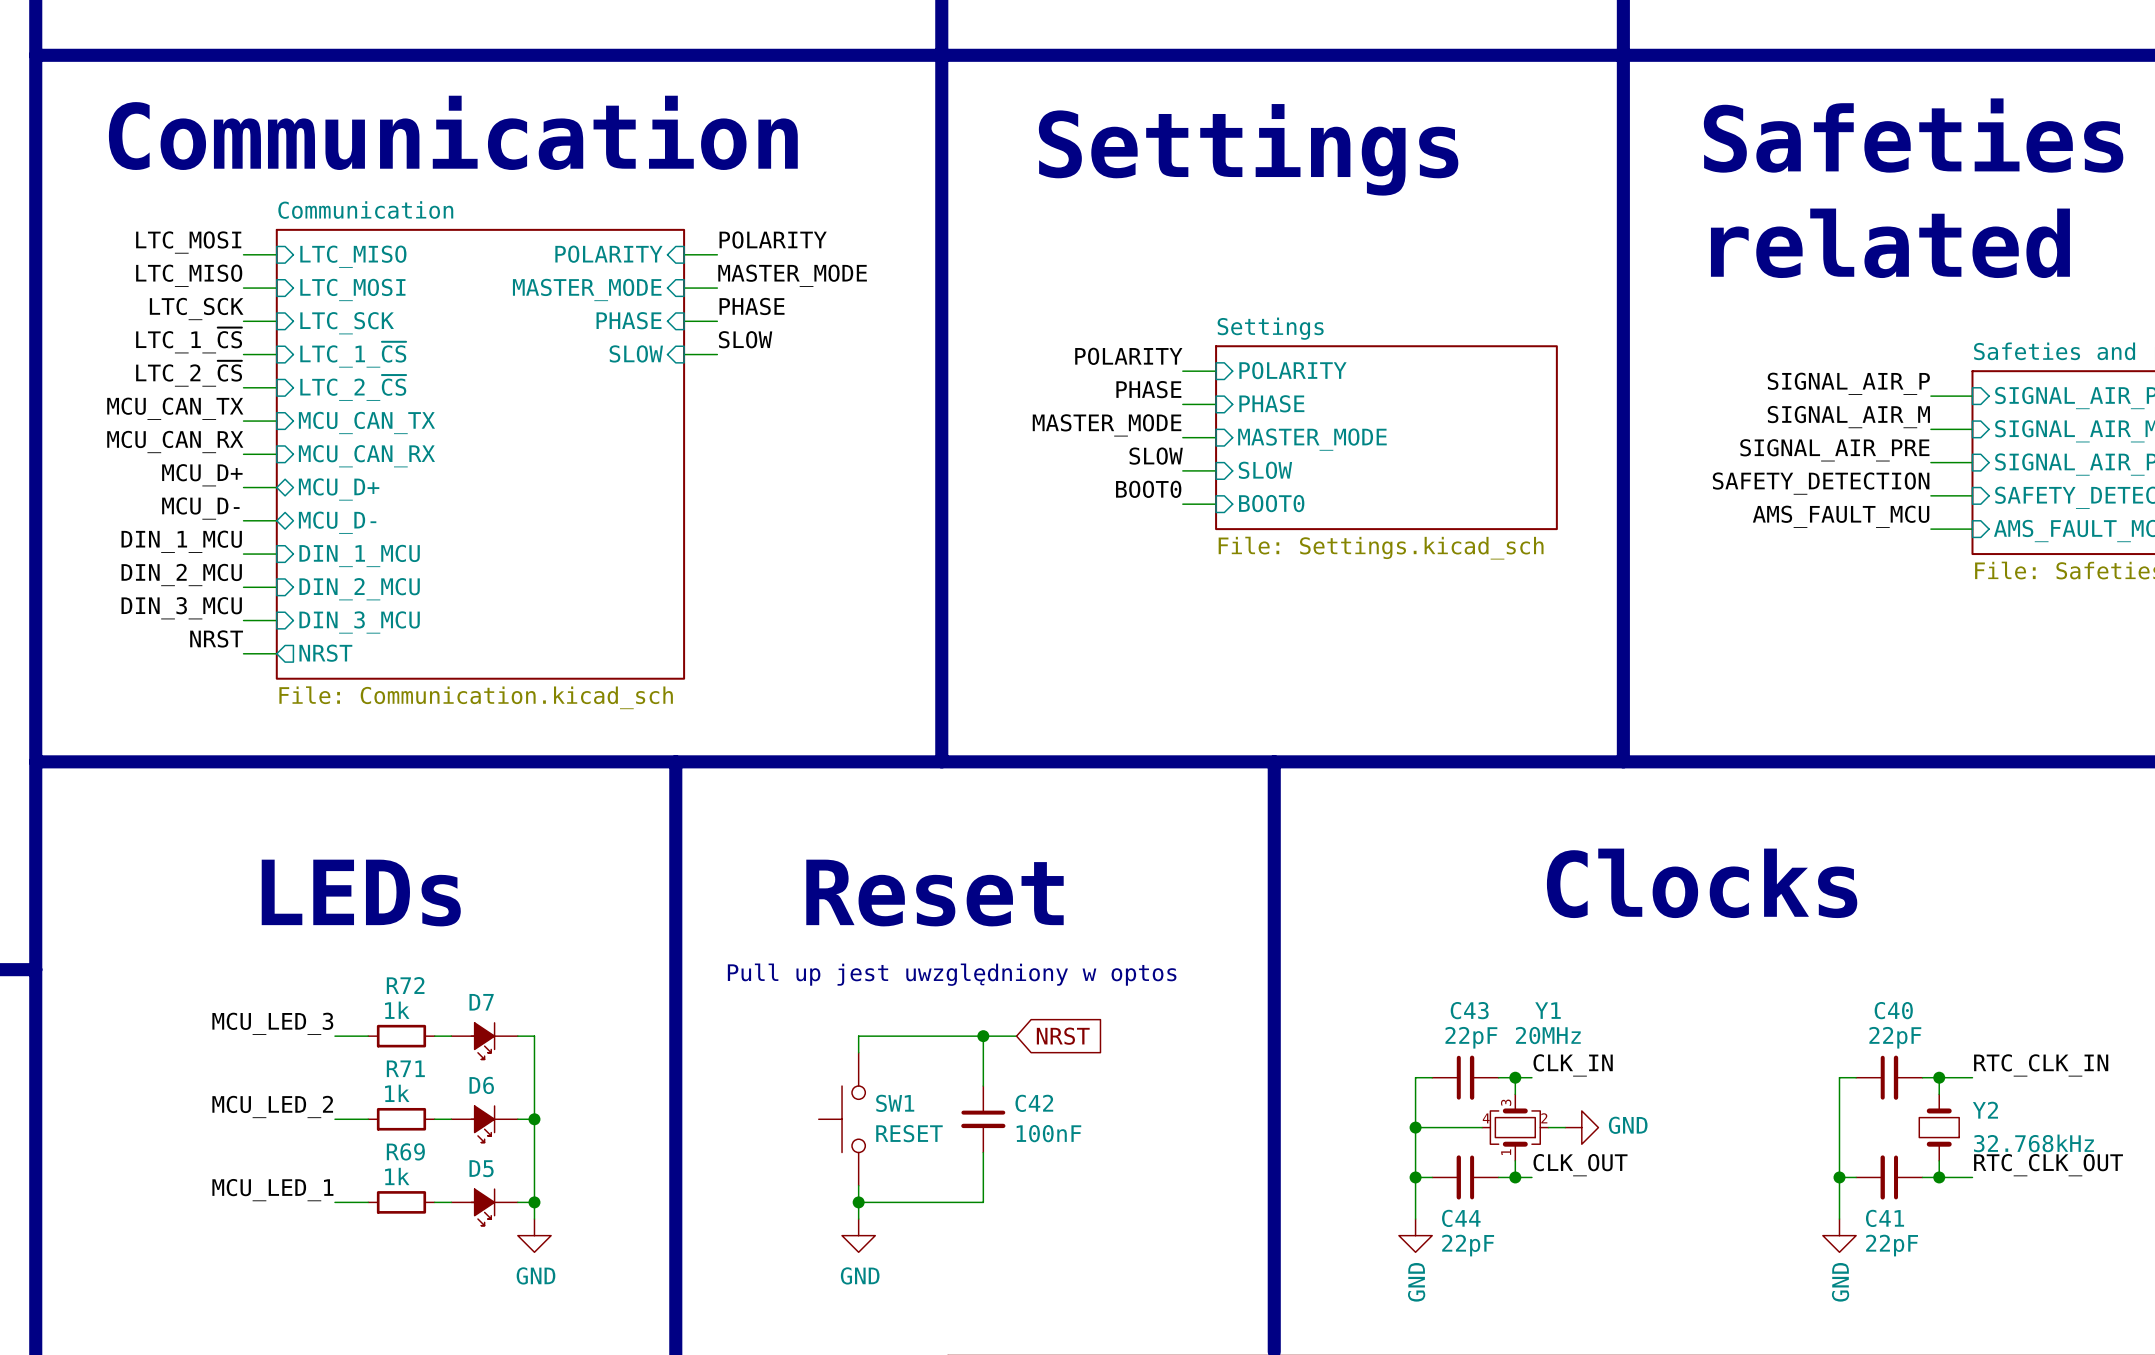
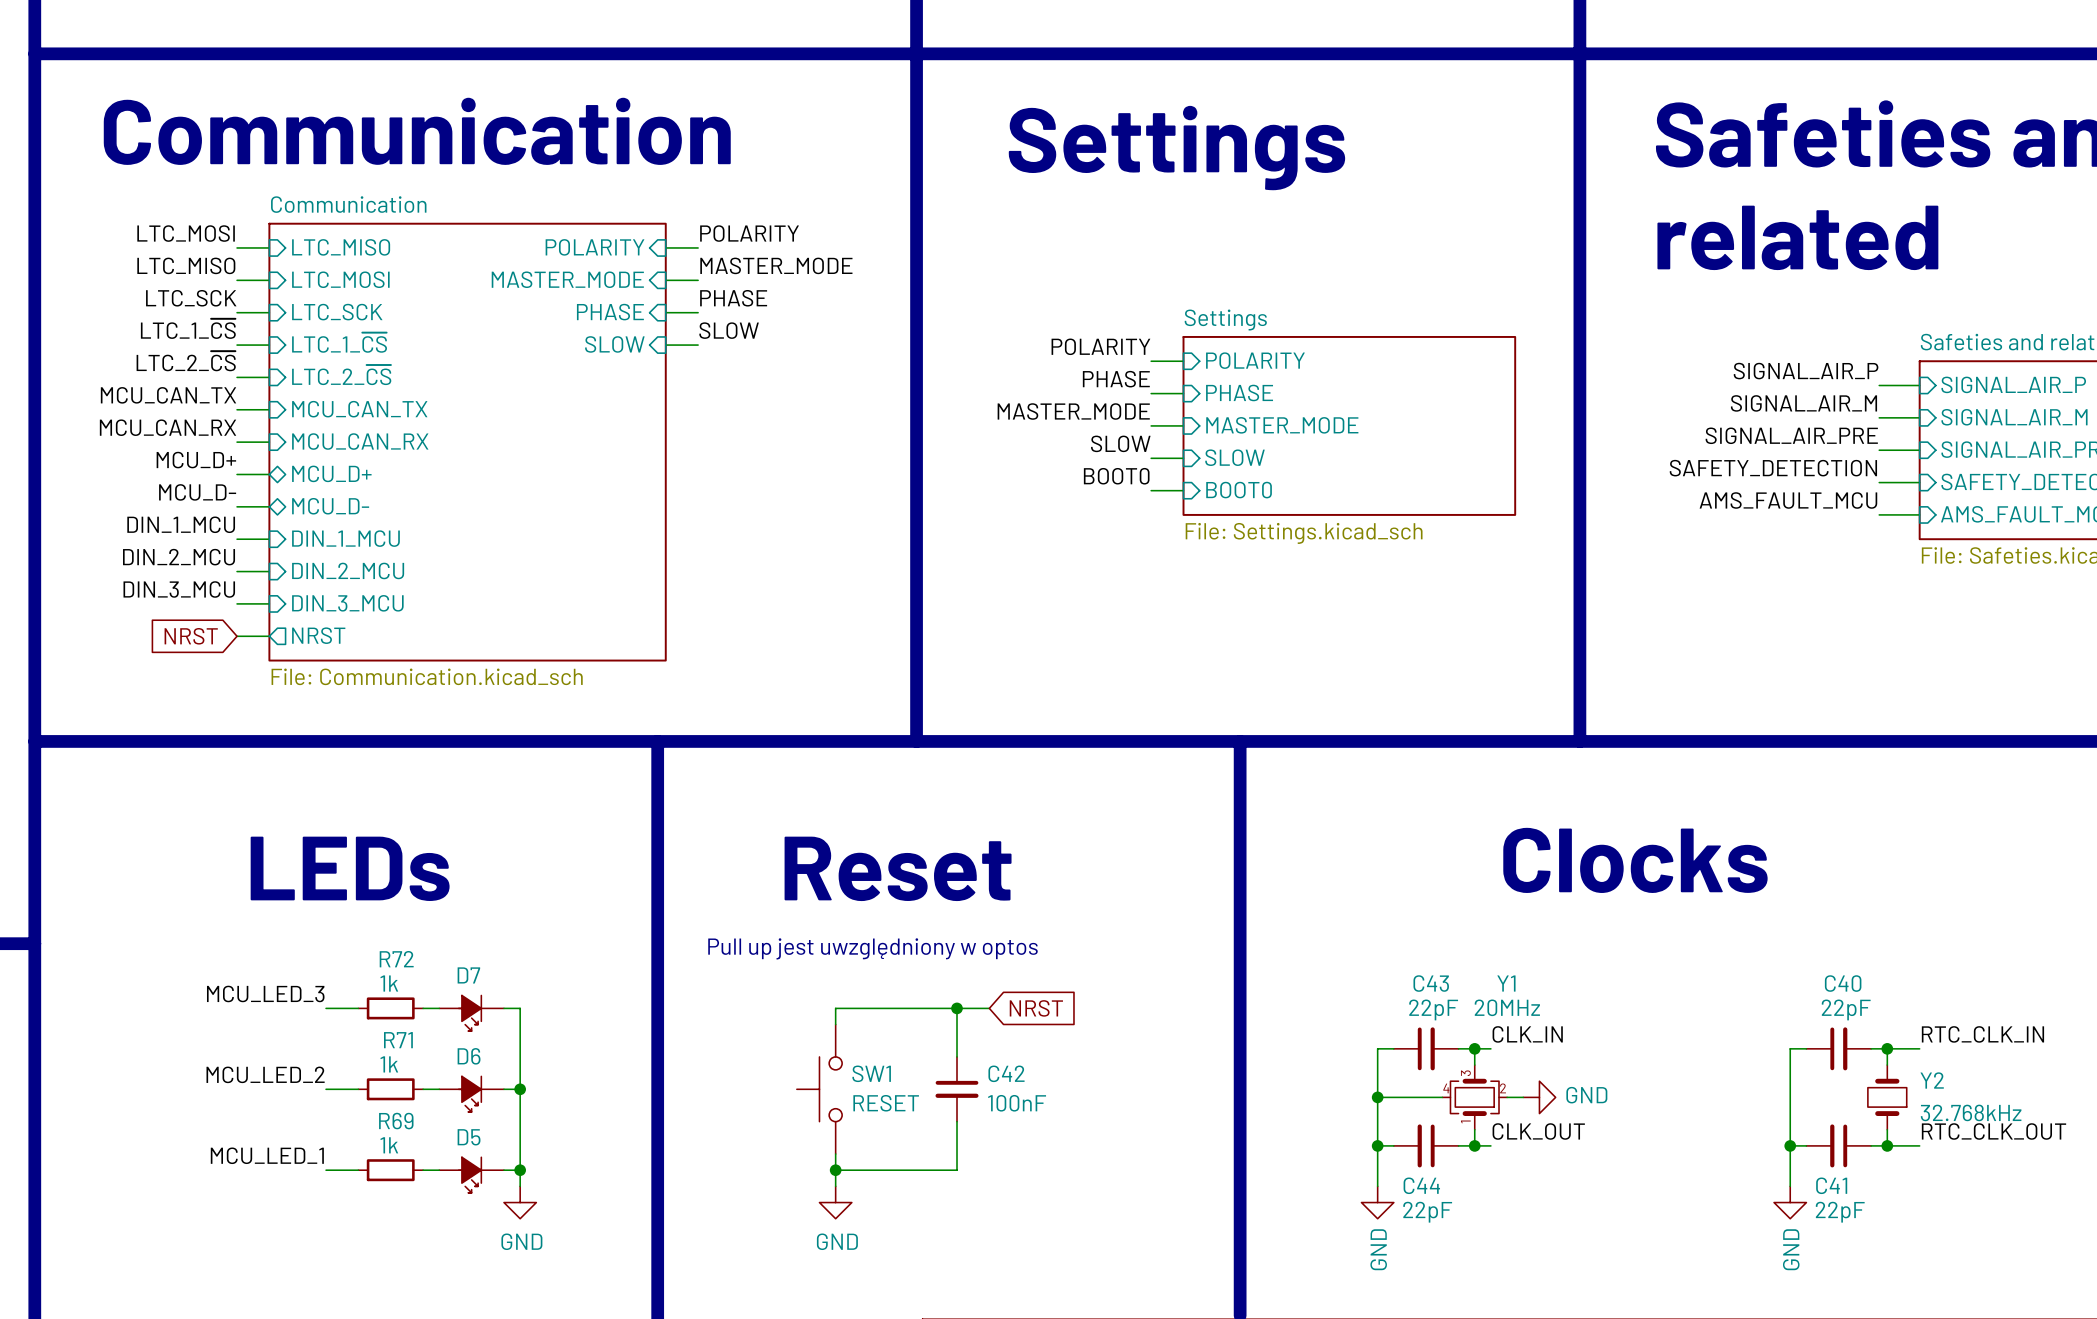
label: NRST (216, 638) -> none
global label: none -> NRST (191, 636)

